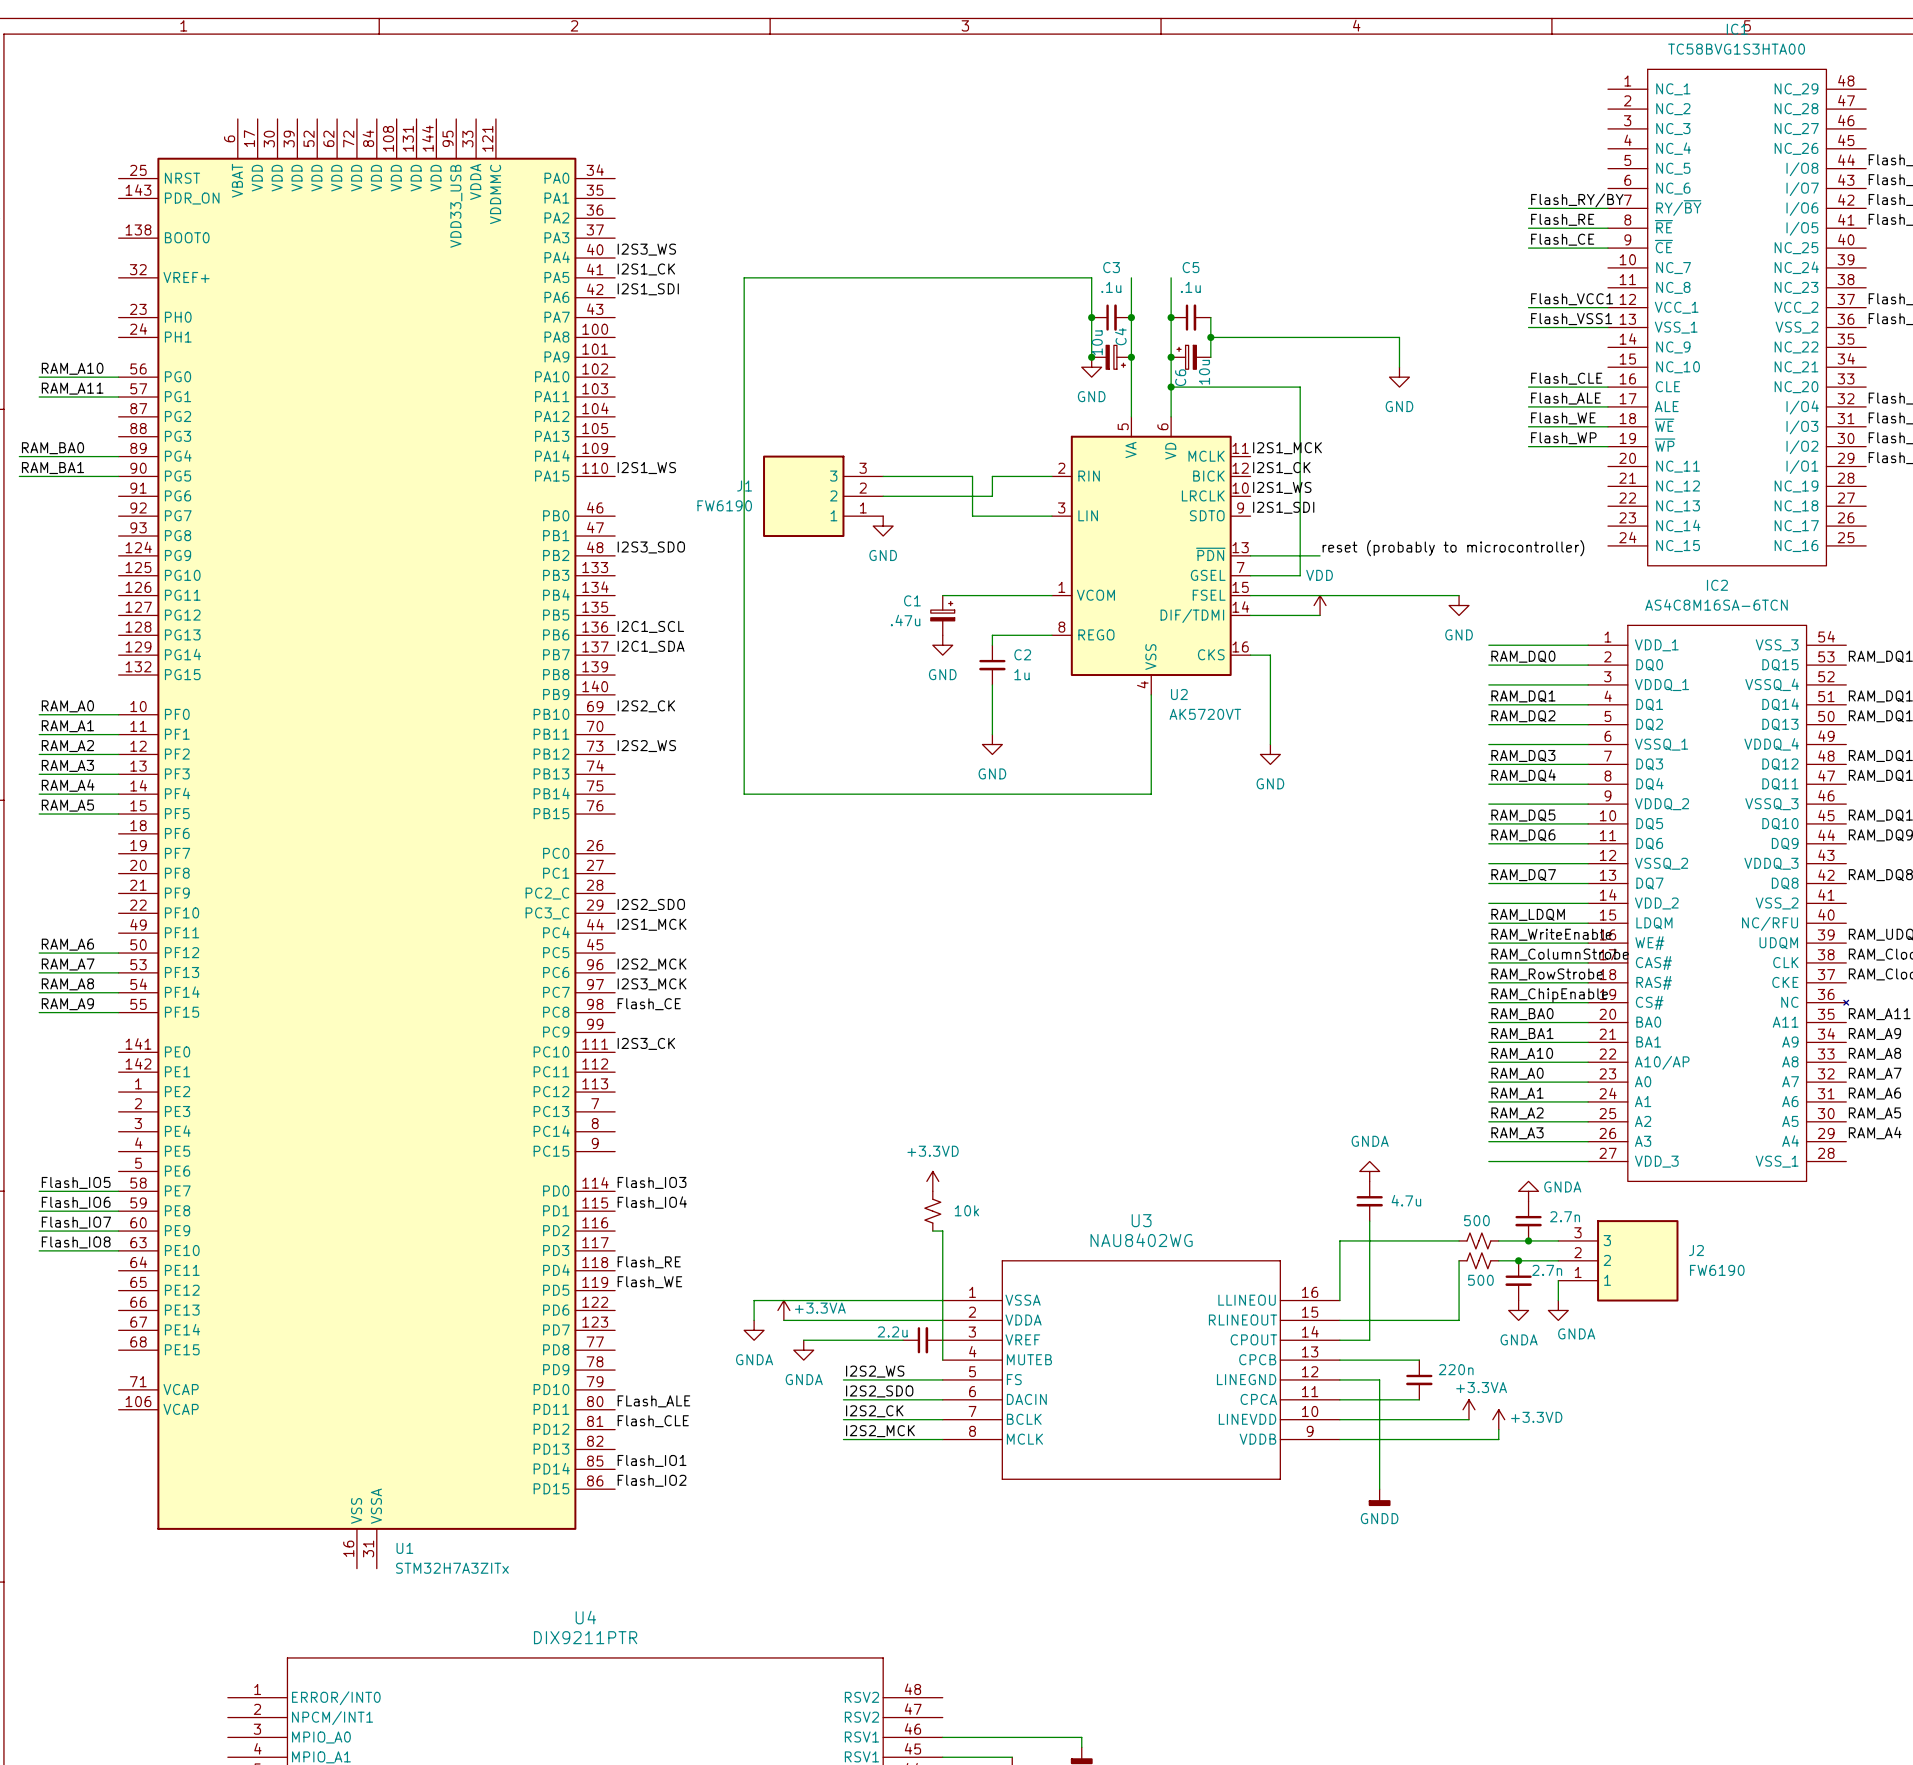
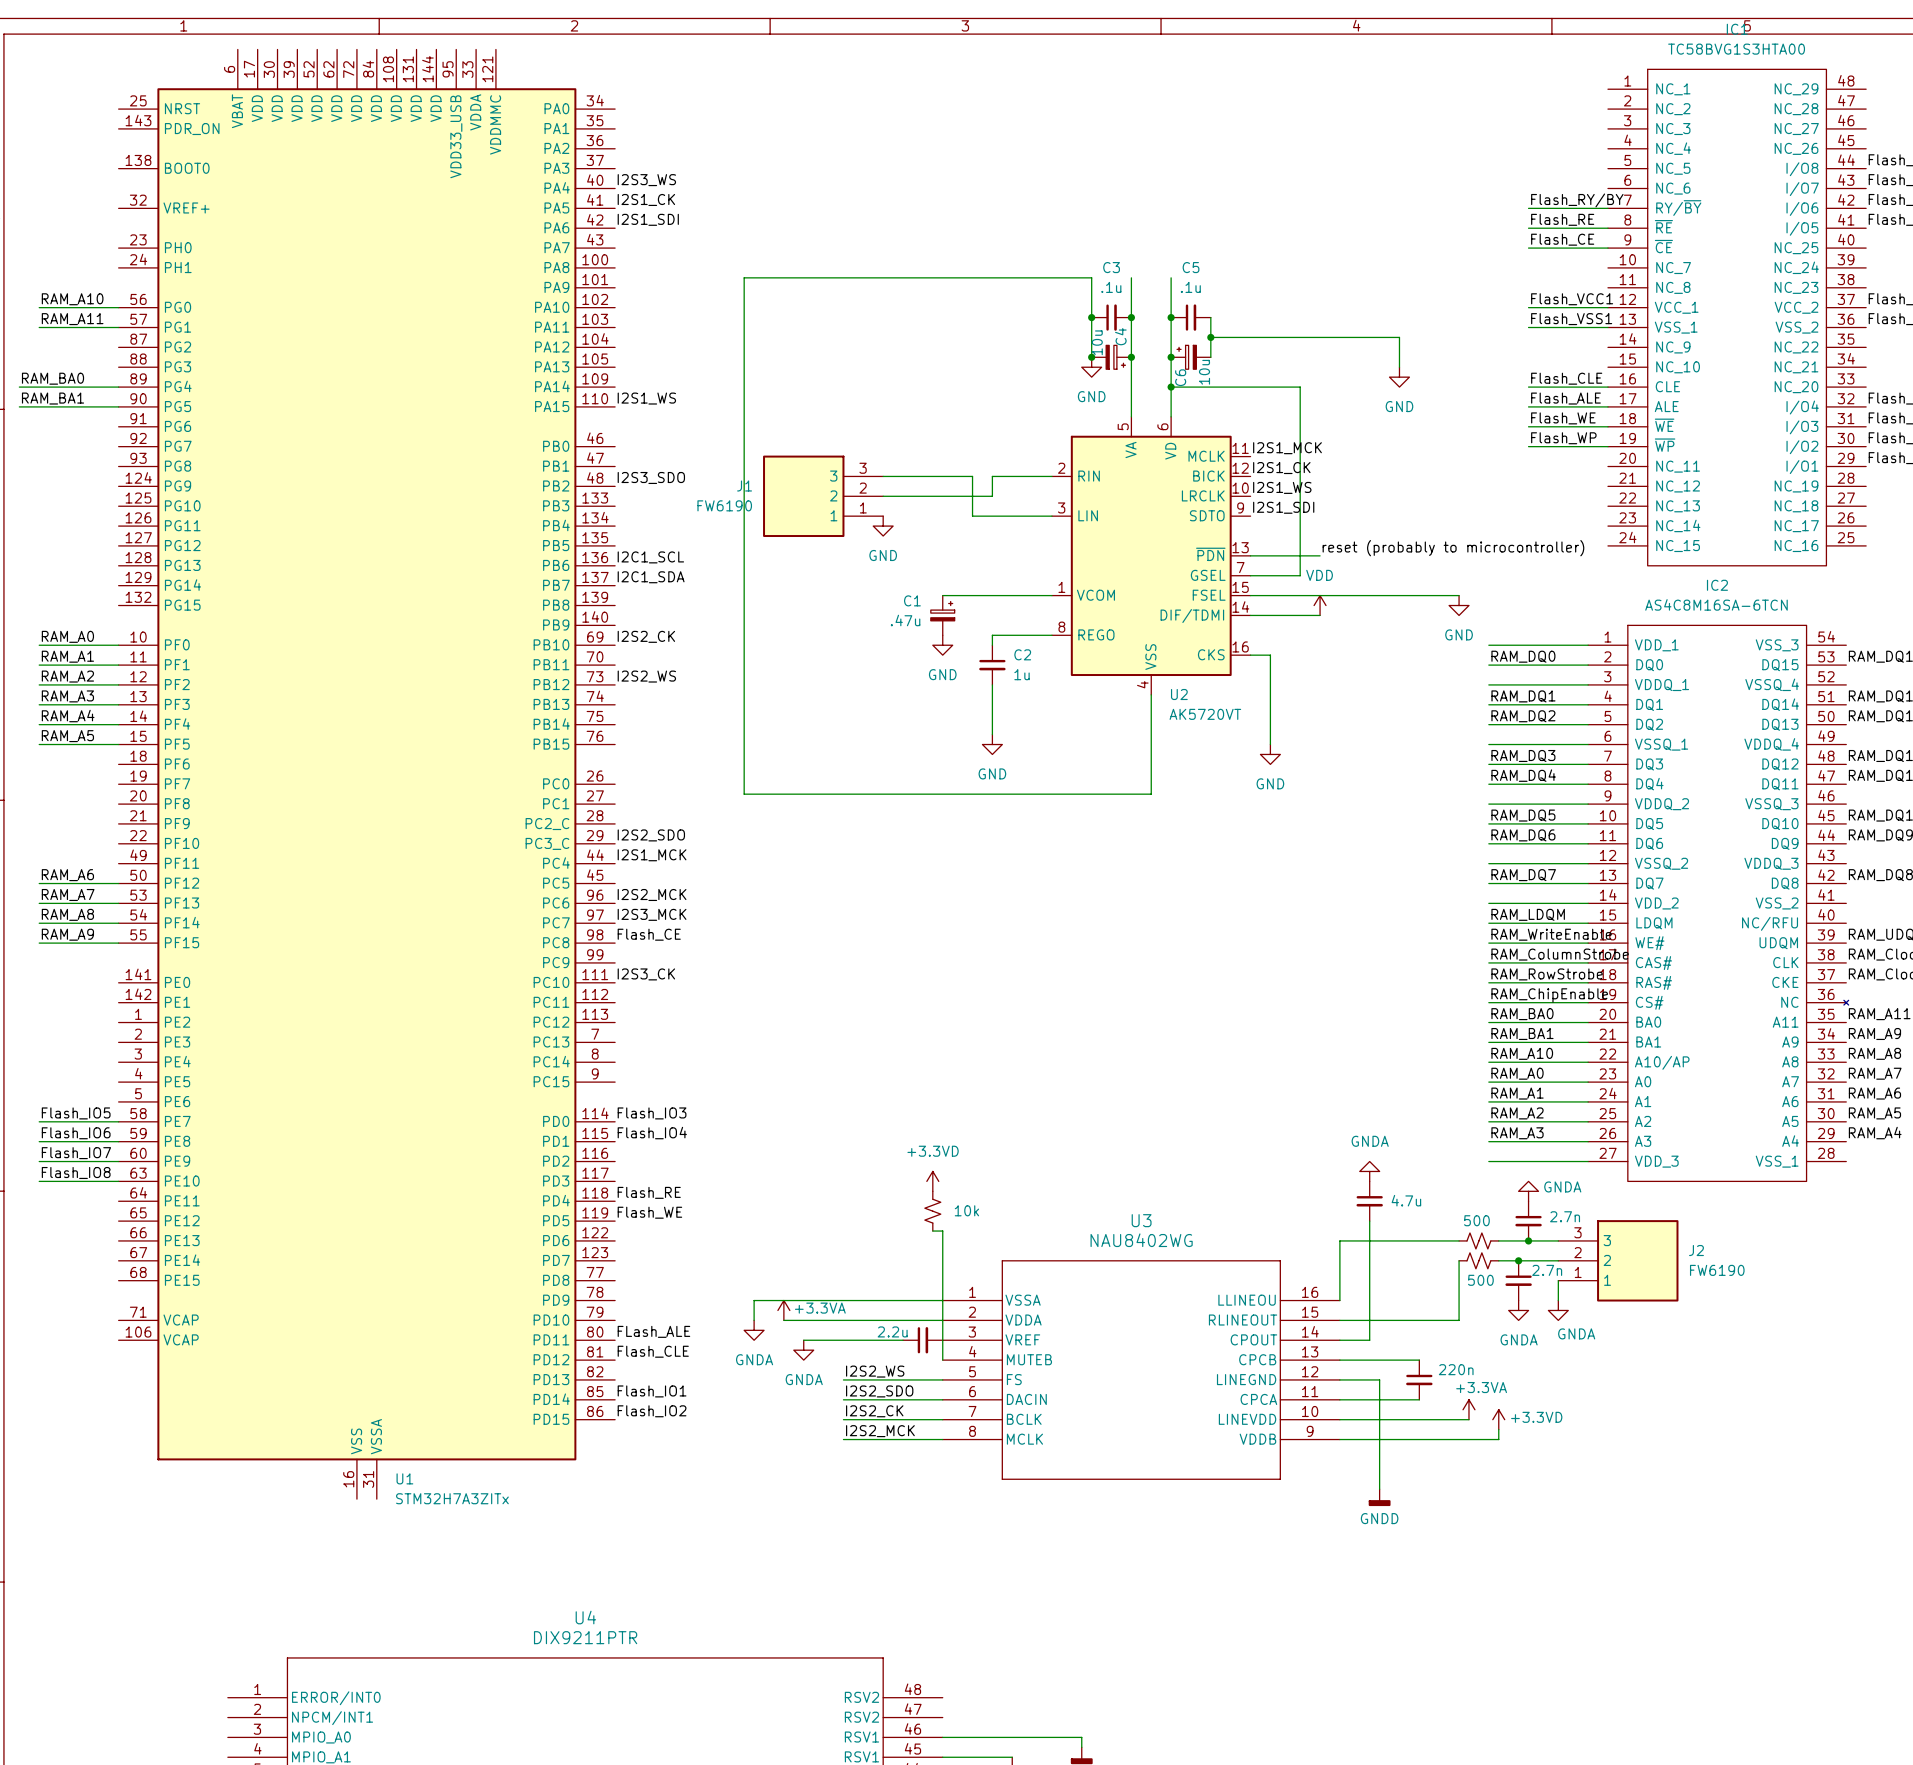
label position: I2S3_WS (646, 249) -> I2S3_WS (646, 180)
label position: I2S1_CK (646, 269) -> I2S1_CK (646, 199)
label position: I2S1_SDI (648, 289) -> I2S1_SDI (648, 219)
label position: RAM_A10 (72, 368) -> RAM_A10 (72, 299)
wire: (39, 377) (118, 377) -> (39, 307) (118, 307)
label position: RAM_A11 (72, 388) -> RAM_A11 (72, 319)
wire: (39, 397) (118, 397) -> (39, 327) (118, 327)
label position: RAM_BA0 (53, 448) -> RAM_BA0 (53, 378)
wire: (19, 456) (118, 456) -> (19, 387) (118, 387)
label position: RAM_BA1 (53, 468) -> RAM_BA1 (53, 398)
label position: I2S1_WS (646, 468) -> I2S1_WS (646, 398)
wire: (19, 476) (118, 476) -> (19, 406) (118, 406)
label position: I2S3_SDO (651, 547) -> I2S3_SDO (651, 477)
label position: I2C1_SCL (650, 626) -> I2C1_SCL (650, 557)
label position: I2C1_SDA (651, 646) -> I2C1_SDA (651, 577)
label position: RAM_A0 (67, 706) -> RAM_A0 (67, 636)
label position: I2S2_CK (646, 706) -> I2S2_CK (646, 636)
wire: (39, 714) (118, 714) -> (39, 645) (118, 645)
label position: RAM_A1 (67, 726) -> RAM_A1 (67, 656)
wire: (39, 734) (118, 734) -> (39, 665) (118, 665)
label position: RAM_A2 (67, 746) -> RAM_A2 (67, 676)
label position: I2S2_WS (646, 746) -> I2S2_WS (646, 676)
wire: (39, 754) (118, 754) -> (39, 684) (118, 684)
label position: RAM_A3 (67, 765) -> RAM_A3 (67, 696)
wire: (39, 774) (118, 774) -> (39, 704) (118, 704)
label position: RAM_A4 (68, 785) -> RAM_A4 (68, 716)
wire: (39, 794) (118, 794) -> (39, 724) (118, 724)
label position: RAM_A5 (67, 805) -> RAM_A5 (67, 736)
wire: (39, 814) (118, 814) -> (39, 744) (118, 744)
U1 position: (366, 843) -> (366, 774)
label position: I2S2_SDO (651, 904) -> I2S2_SDO (651, 835)
label position: I2S1_MCK (652, 924) -> I2S1_MCK (652, 855)
label position: RAM_A6 (67, 944) -> RAM_A6 (67, 875)
wire: (39, 953) (118, 953) -> (39, 883) (118, 883)
label position: RAM_A7 (68, 964) -> RAM_A7 (68, 894)
label position: I2S2_MCK (652, 964) -> I2S2_MCK (652, 894)
wire: (39, 972) (118, 972) -> (39, 903) (118, 903)
label position: RAM_A8 (67, 984) -> RAM_A8 (67, 914)
label position: I2S3_MCK (652, 984) -> I2S3_MCK (652, 914)
wire: (39, 992) (118, 992) -> (39, 923) (118, 923)
label position: RAM_A9 (67, 1004) -> RAM_A9 (67, 934)
label position: Flash_CE (649, 1004) -> Flash_CE (649, 934)
wire: (39, 1012) (118, 1012) -> (39, 943) (118, 943)
label position: I2S3_CK (646, 1043) -> I2S3_CK (646, 974)
label position: Flash_IO5 (76, 1182) -> Flash_IO5 (76, 1113)
label position: Flash_IO3 (652, 1182) -> Flash_IO3 (652, 1113)
wire: (39, 1191) (118, 1191) -> (39, 1121) (118, 1121)
label position: Flash_IO6 (76, 1202) -> Flash_IO6 (76, 1133)
label position: Flash_IO4 (652, 1202) -> Flash_IO4 (652, 1133)
wire: (39, 1211) (118, 1211) -> (39, 1141) (118, 1141)
label position: Flash_IO7 (76, 1222) -> Flash_IO7 (76, 1153)
wire: (39, 1231) (118, 1231) -> (39, 1161) (118, 1161)
label position: Flash_IO8 (76, 1242) -> Flash_IO8 (76, 1173)
wire: (39, 1250) (118, 1250) -> (39, 1181) (118, 1181)
label position: Flash_RE (649, 1262) -> Flash_RE (649, 1192)
label position: Flash_WE (649, 1282) -> Flash_WE (649, 1212)
label position: FLash_ALE (653, 1401) -> FLash_ALE (653, 1331)
label position: Flash_CLE (653, 1421) -> Flash_CLE (653, 1351)
label position: Flash_IO1 (652, 1460) -> Flash_IO1 (652, 1391)
label position: Flash_IO2 (652, 1480) -> Flash_IO2 (652, 1411)

